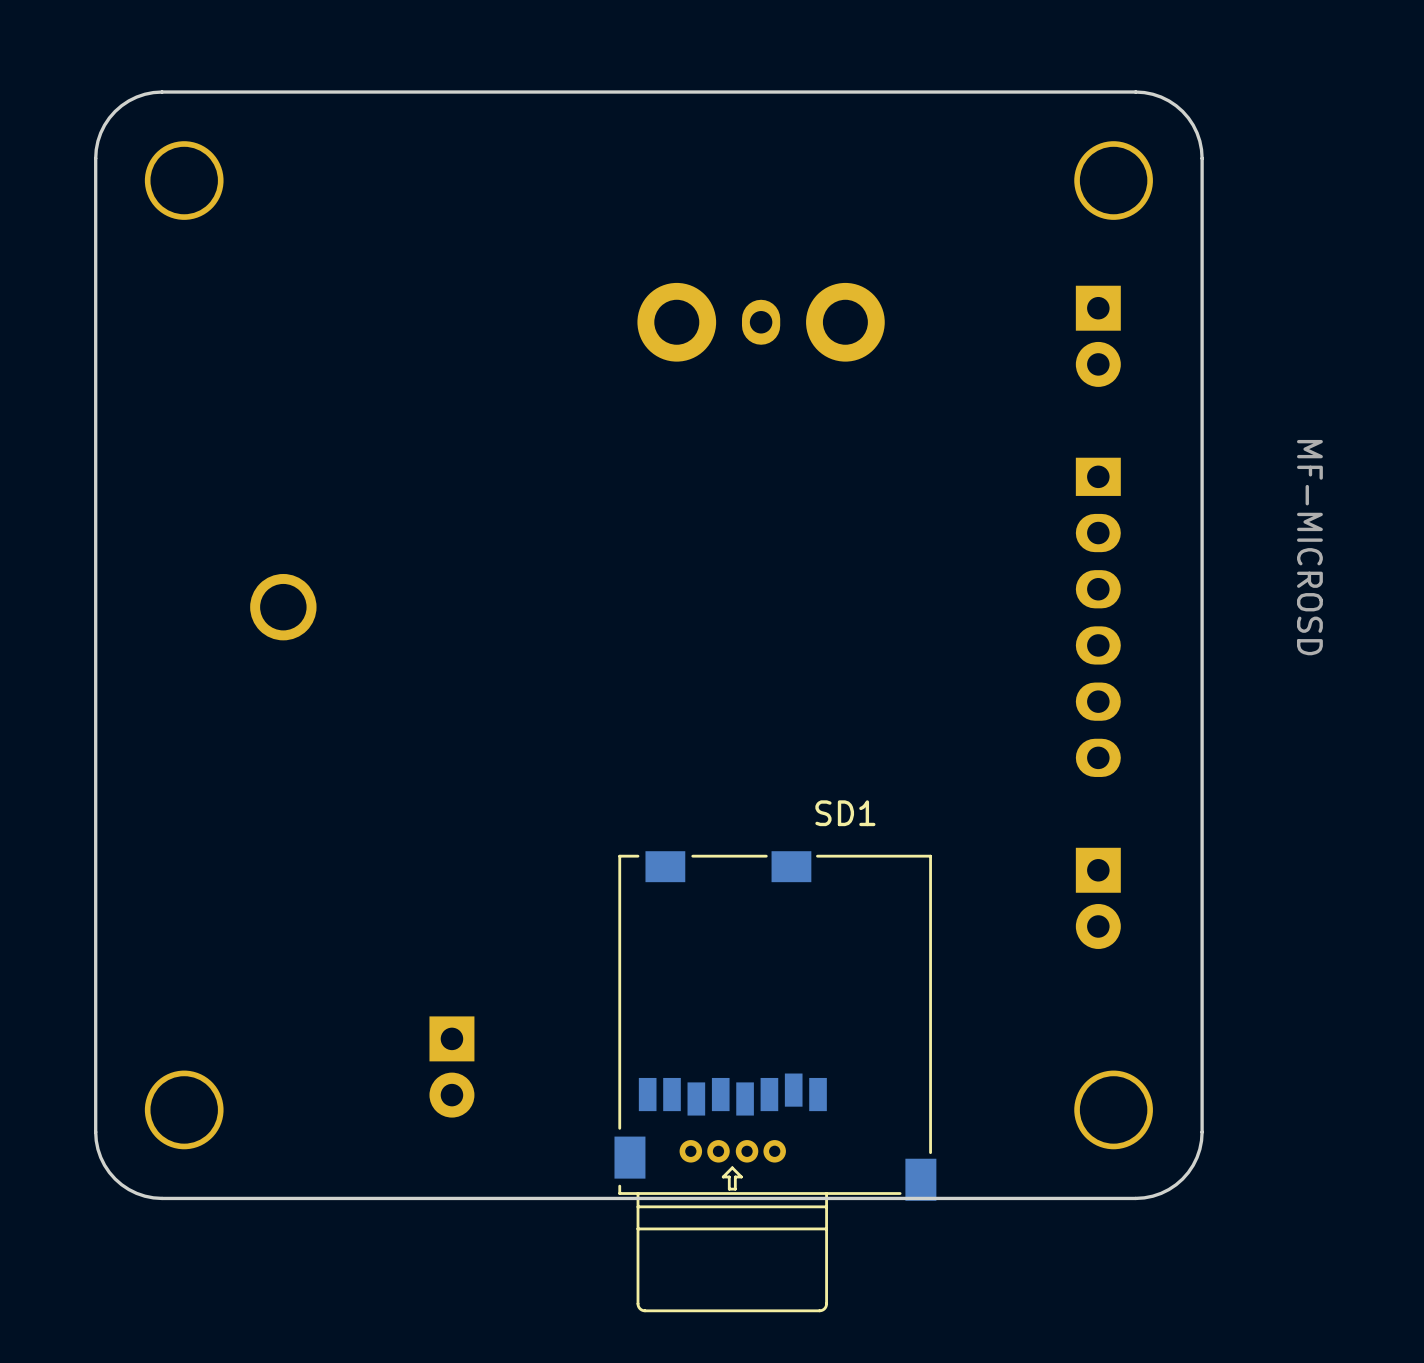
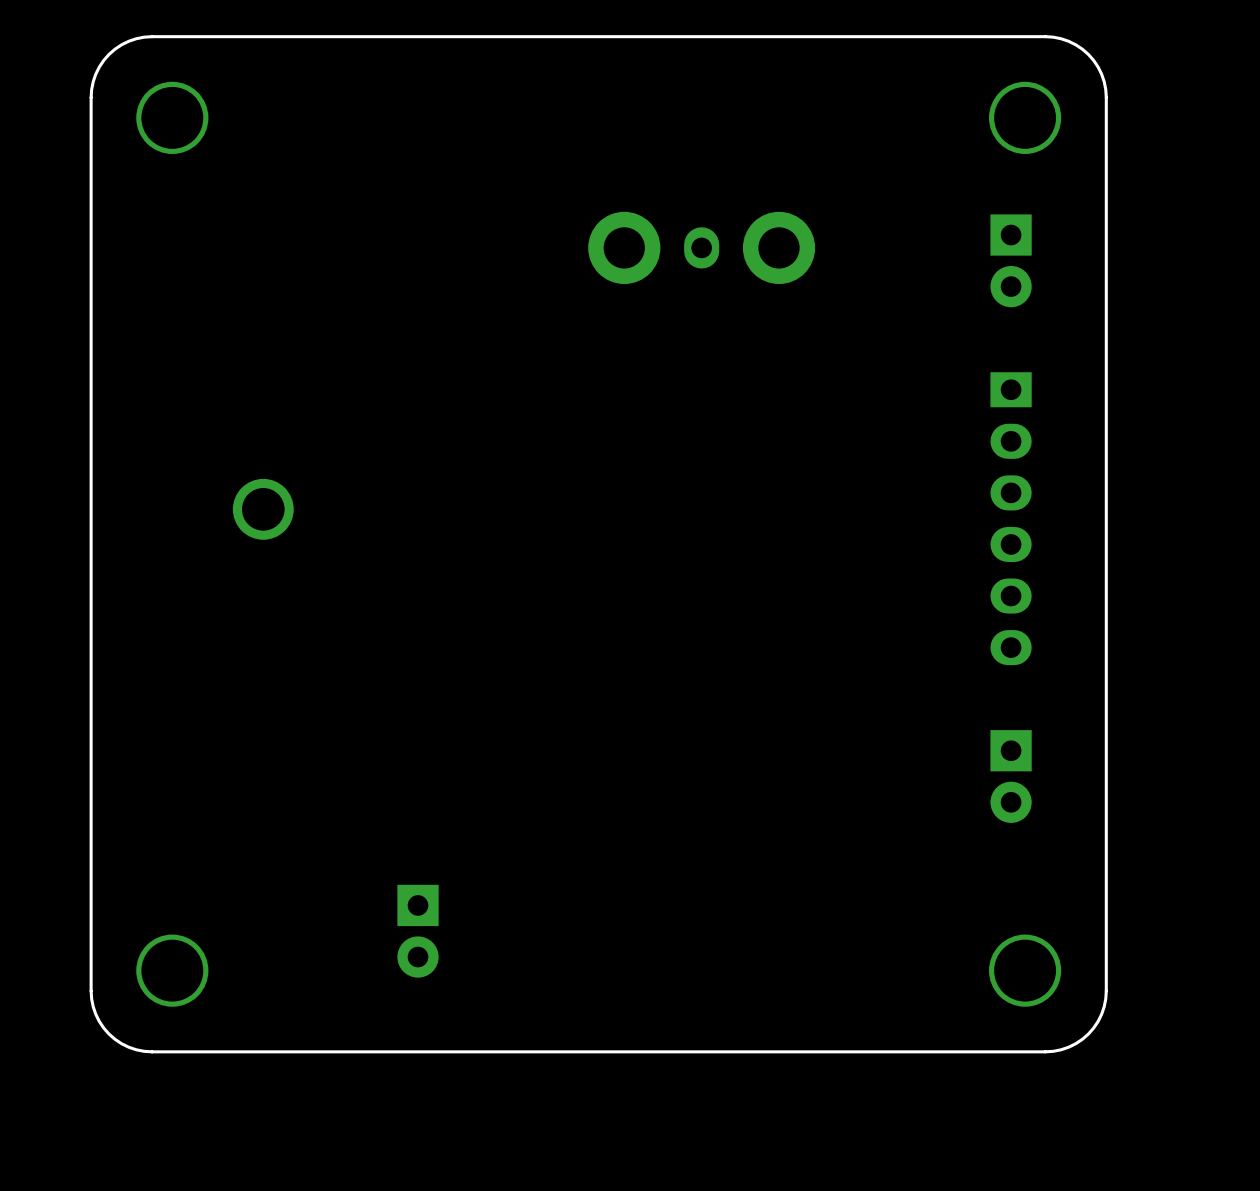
SD1: MF-MICROSD (775, 1081) -> none
part: (704, 1151) -> none
part: (760, 1151) -> none

